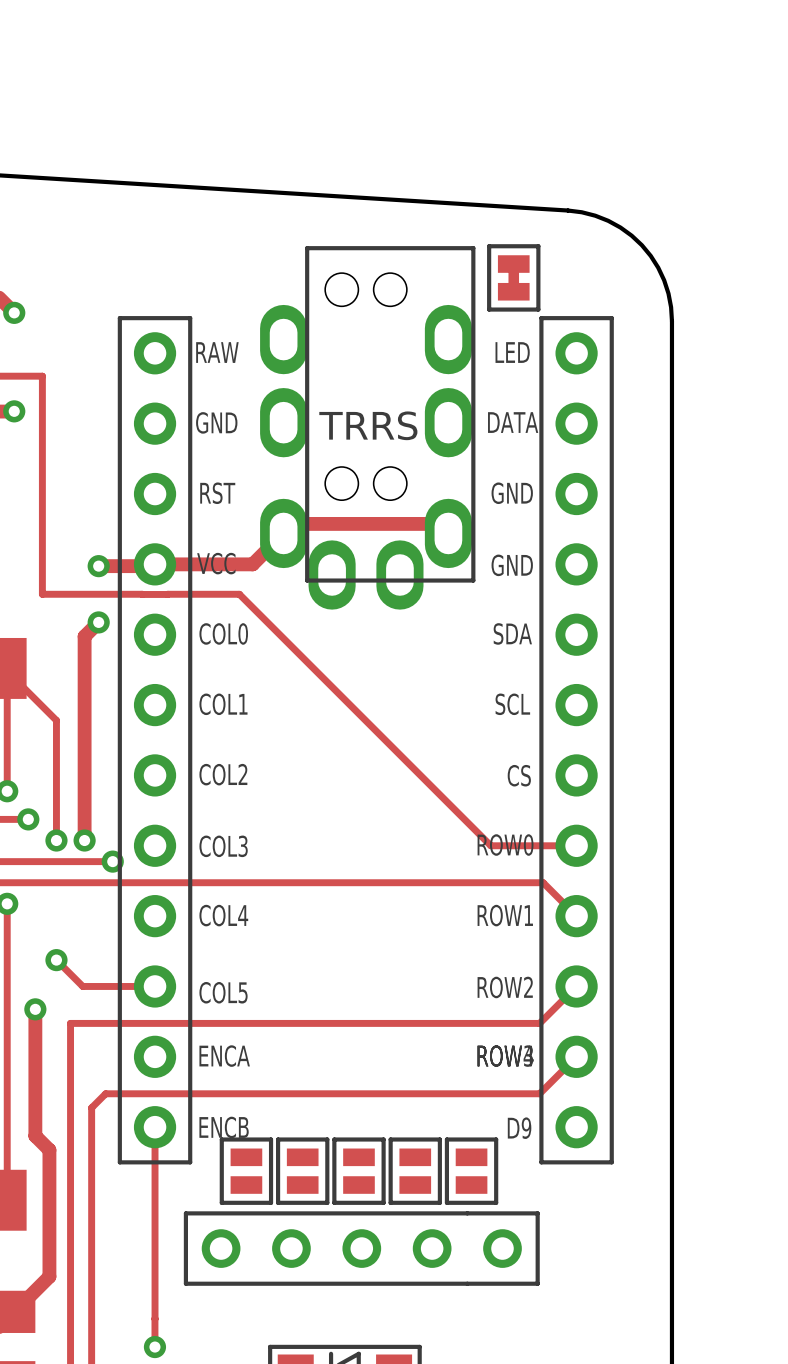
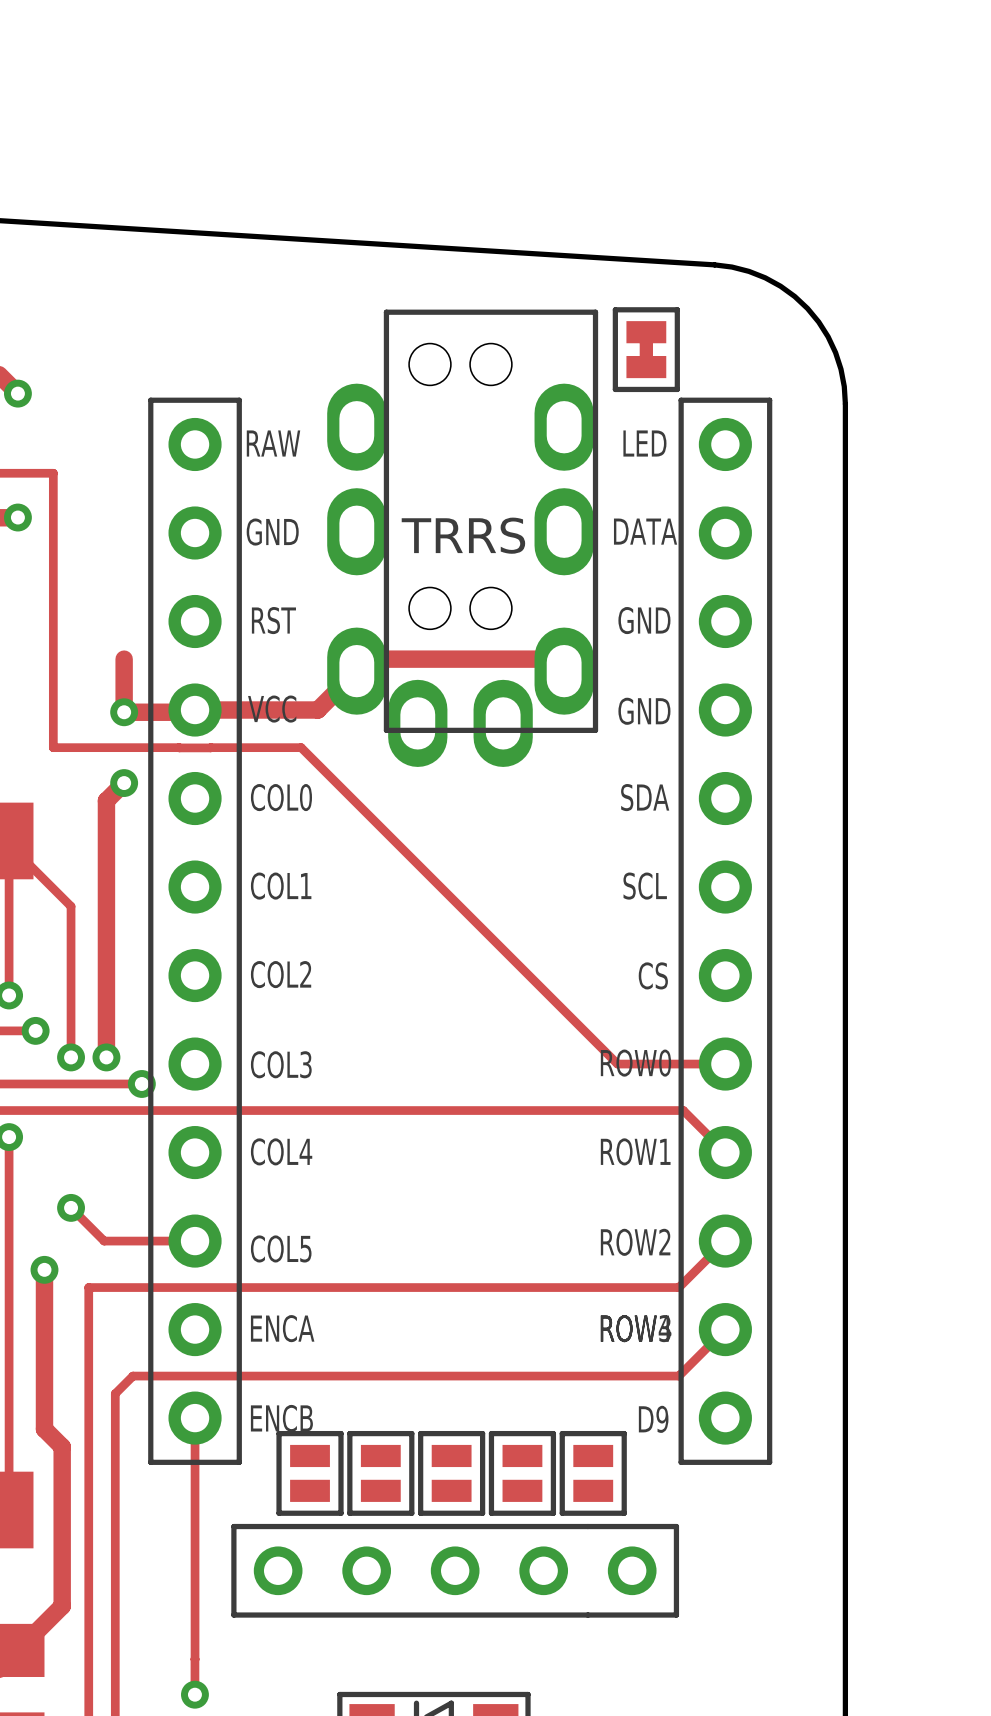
track: none -> (124, 659) (124, 712)

